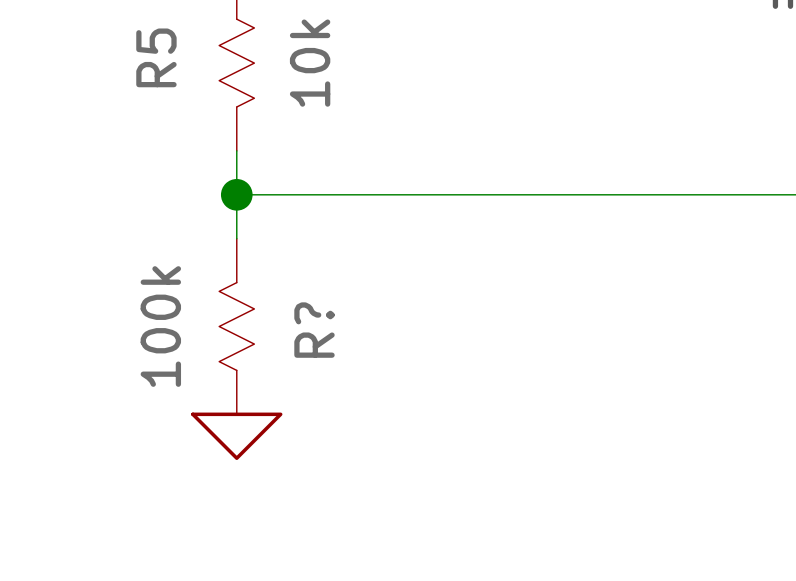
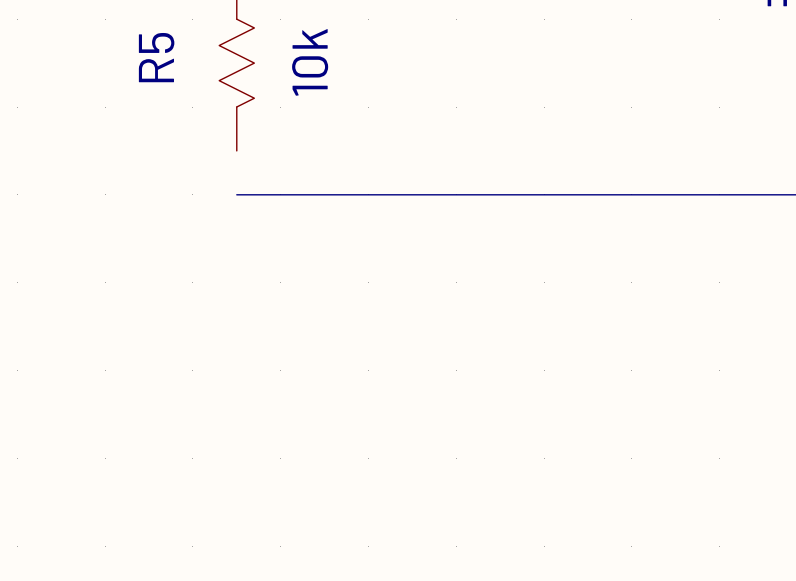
wire: (236, 150) (236, 238) -> none
junction: (236, 194) -> none
R?: 100k (236, 326) -> none
power symbol: (236, 436) -> none

